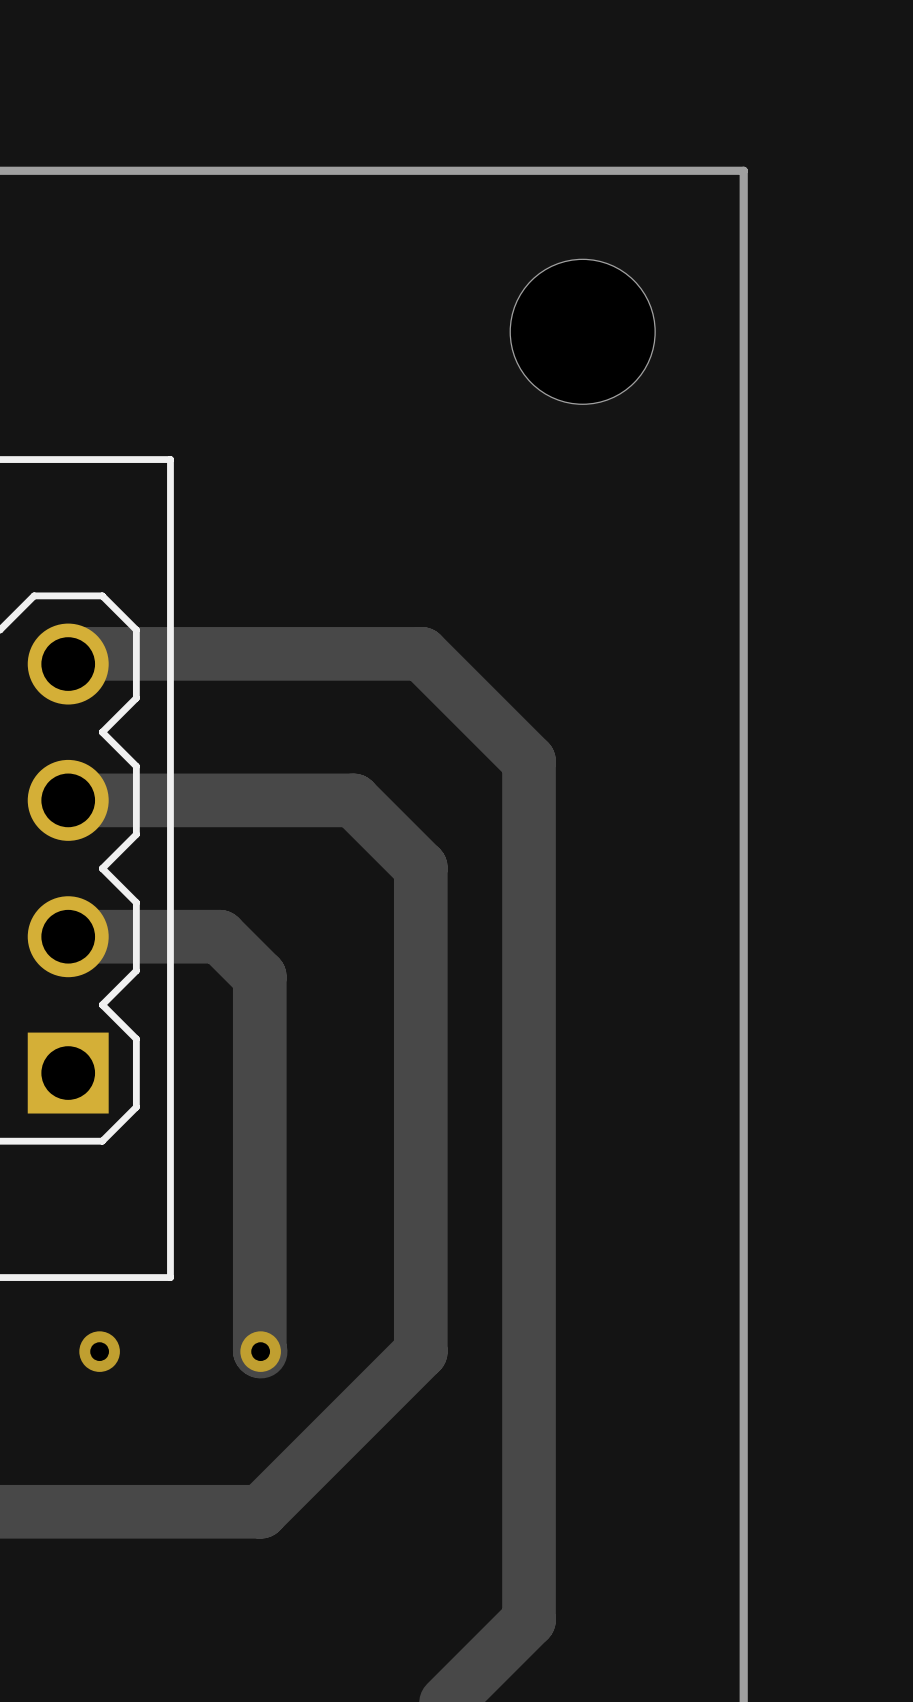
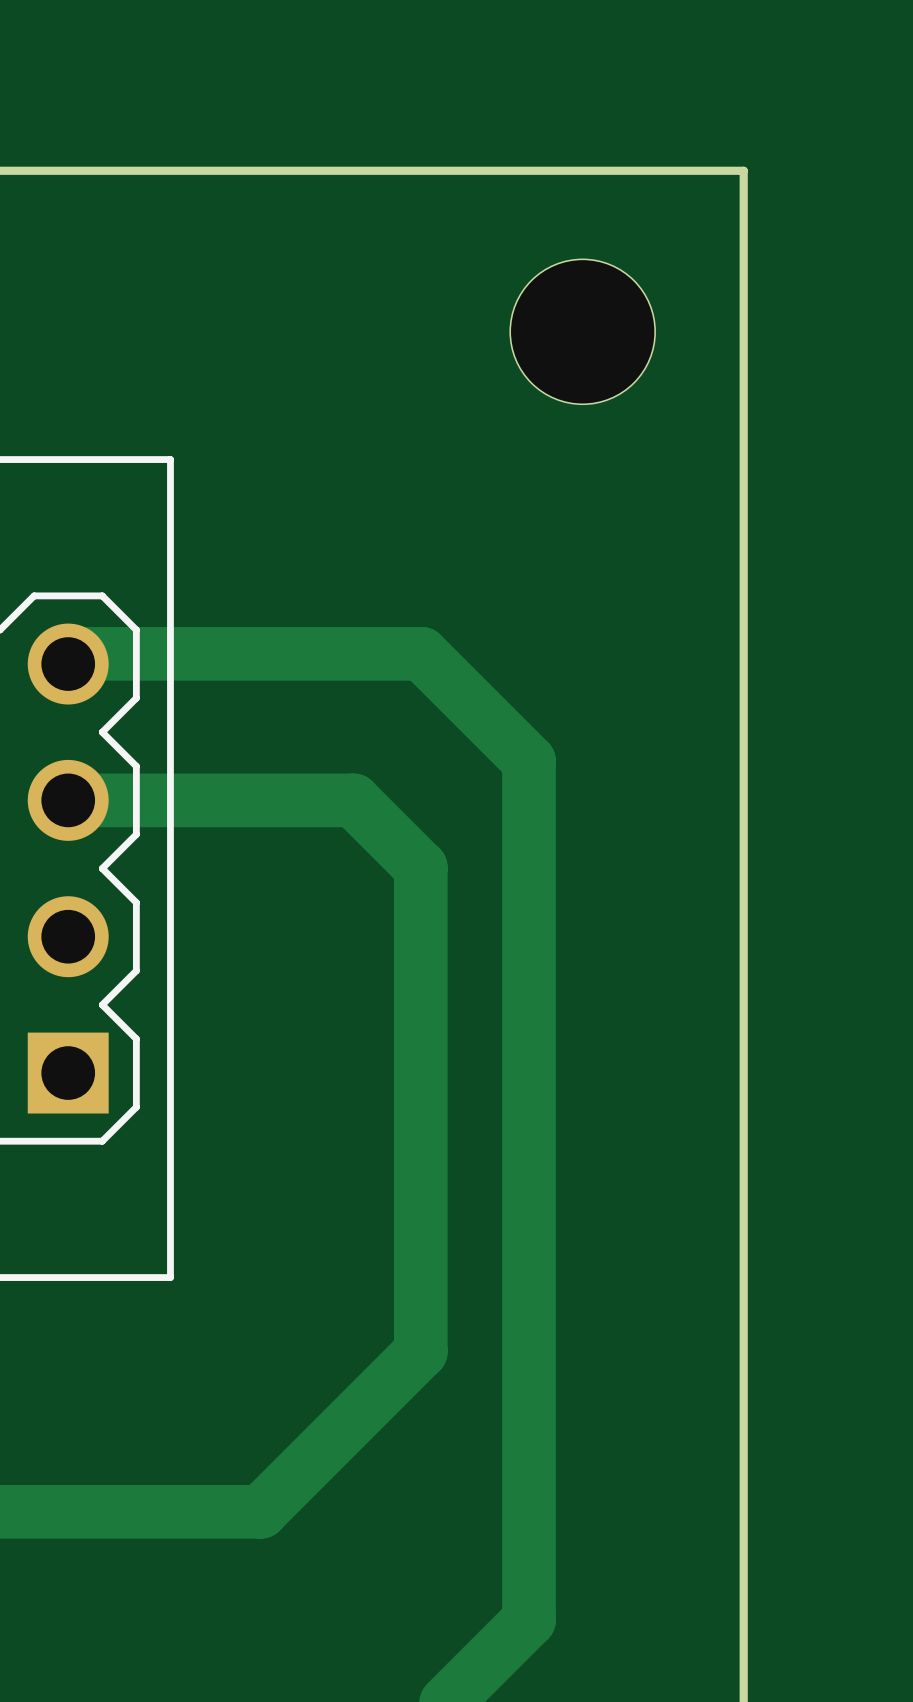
track: (68, 936) (219, 936) (259, 976) (260, 1351) -> none
via: (99, 1351) -> none
via: (260, 1351) -> none

